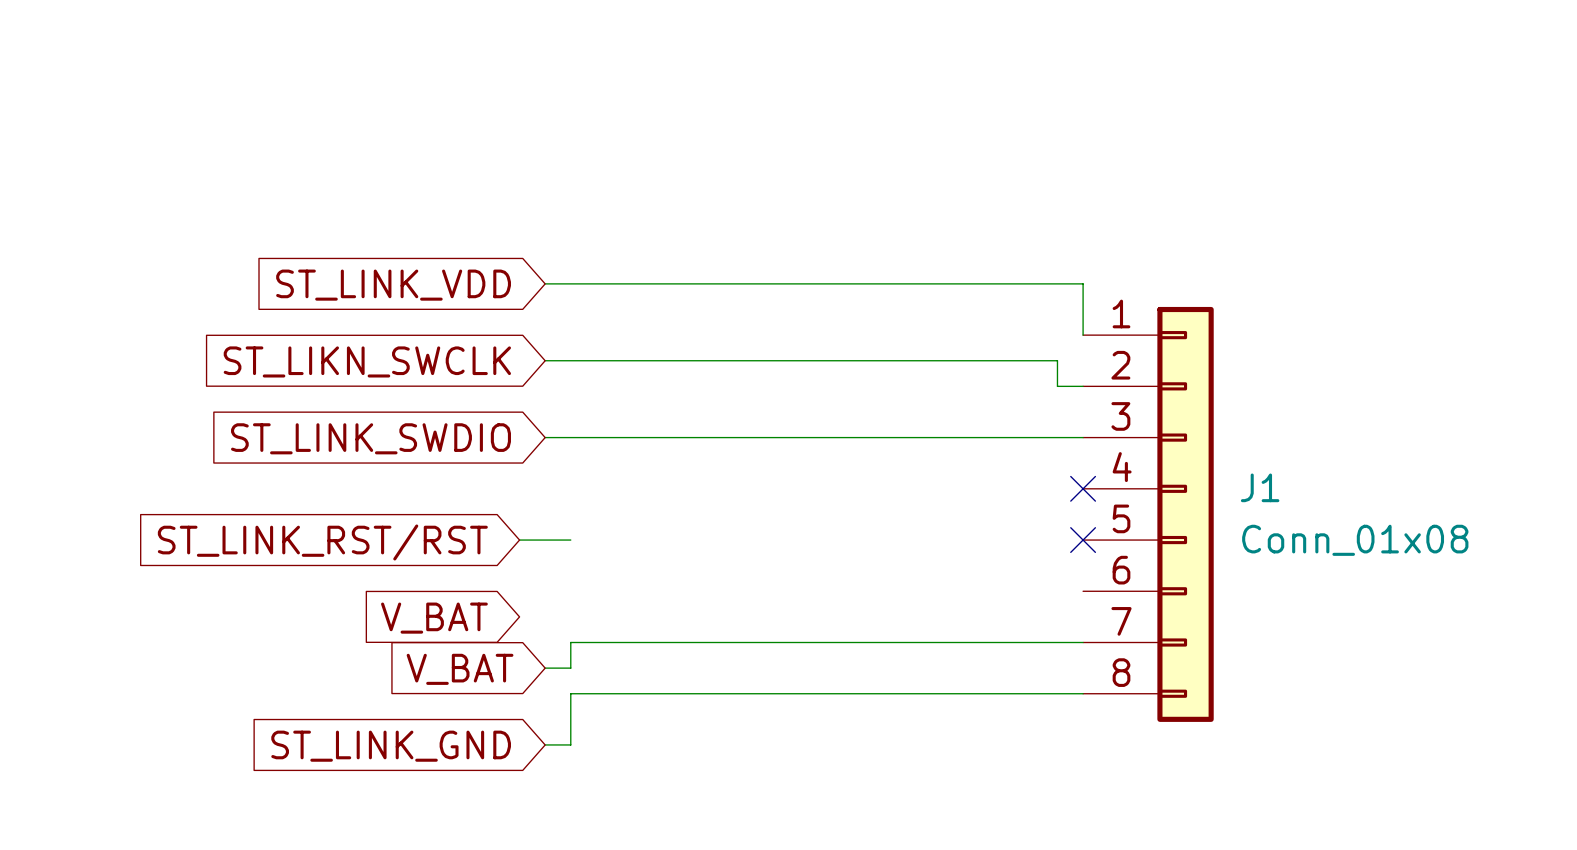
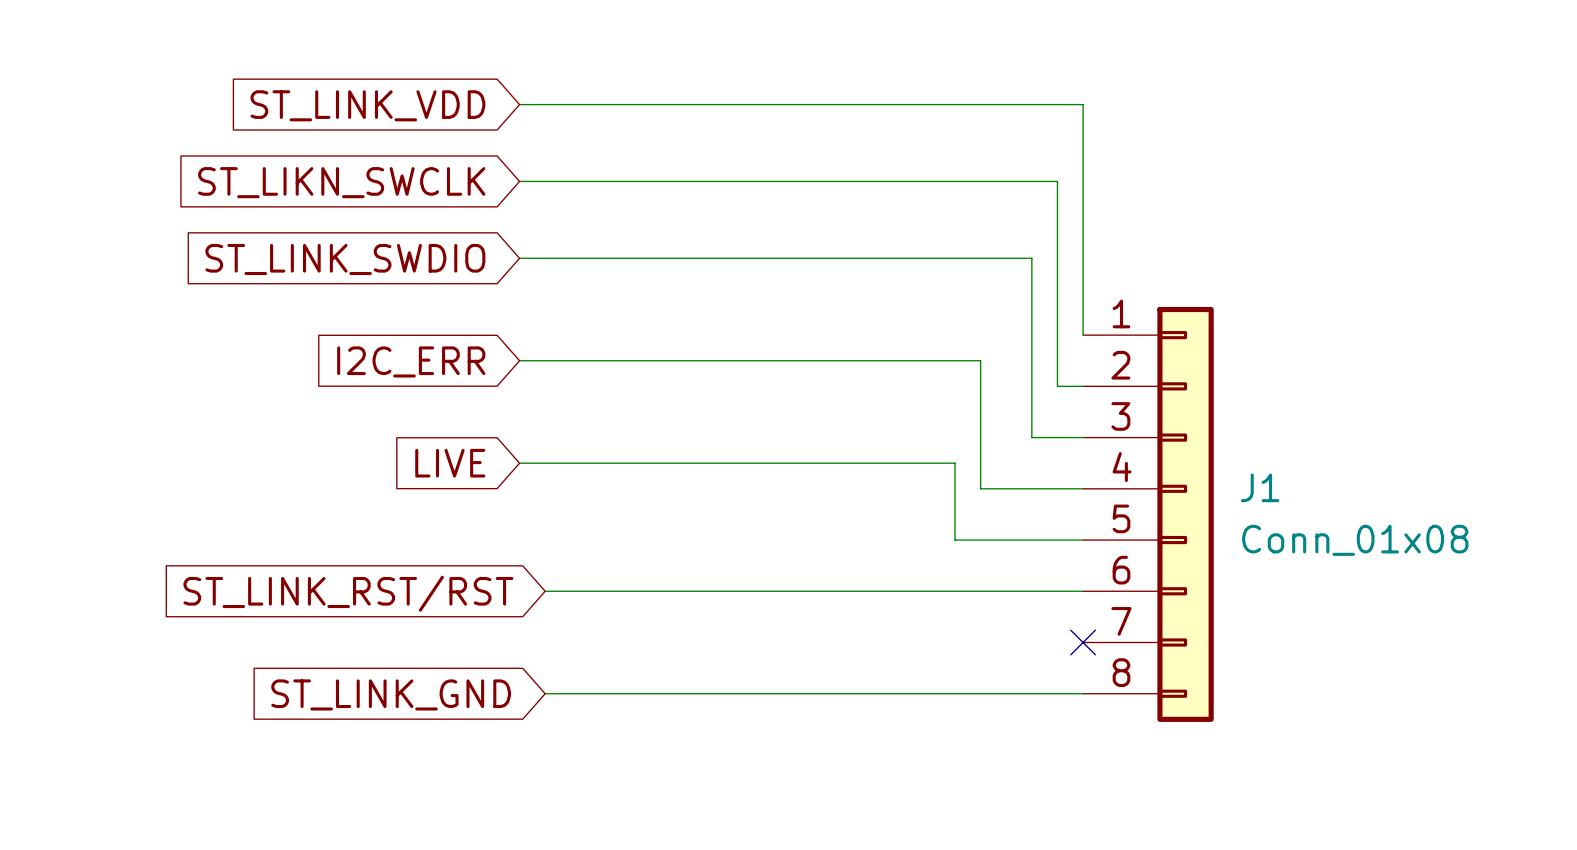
wire: none -> (519, 181) (1057, 181) (1057, 360)
wire: (545, 283) (1083, 283) -> (519, 104) (1083, 104) (1083, 283)
global label position: ST_LINK_VDD (393, 285) -> ST_LINK_VDD (367, 105)
wire: none -> (519, 360) (545, 360)
wire: (980, 360) (1057, 360) -> (980, 360) (980, 488) (1083, 488)
global label position: ST_LIKN_SWCLK (367, 361) -> ST_LIKN_SWCLK (341, 182)
global label: none -> I2C_ERR (411, 361)
wire: (545, 437) (1031, 437) -> (519, 258) (1031, 258) (1031, 437)
global label position: ST_LINK_SWDIO (371, 438) -> ST_LINK_SWDIO (345, 259)
global label: none -> LIVE (450, 463)
wire: none -> (519, 463) (955, 463) (955, 540) (1083, 540)
no-connect mark: (1083, 488) -> none
wire: (519, 540) (570, 540) -> none
no-connect mark: (1083, 540) -> none
global label position: ST_LINK_RST/RST (322, 542) -> ST_LINK_RST/RST (348, 593)
wire: none -> (545, 591) (1083, 591)
global label: V_BAT (434, 618) -> none
wire: (1083, 642) (570, 642) (570, 668) (545, 668) -> none
no-connect mark: none -> (1083, 642)
global label: V_BAT (460, 669) -> none
wire: (570, 693) (570, 744) (545, 744) -> (570, 693) (545, 693)
global label position: ST_LINK_GND (391, 746) -> ST_LINK_GND (391, 694)

